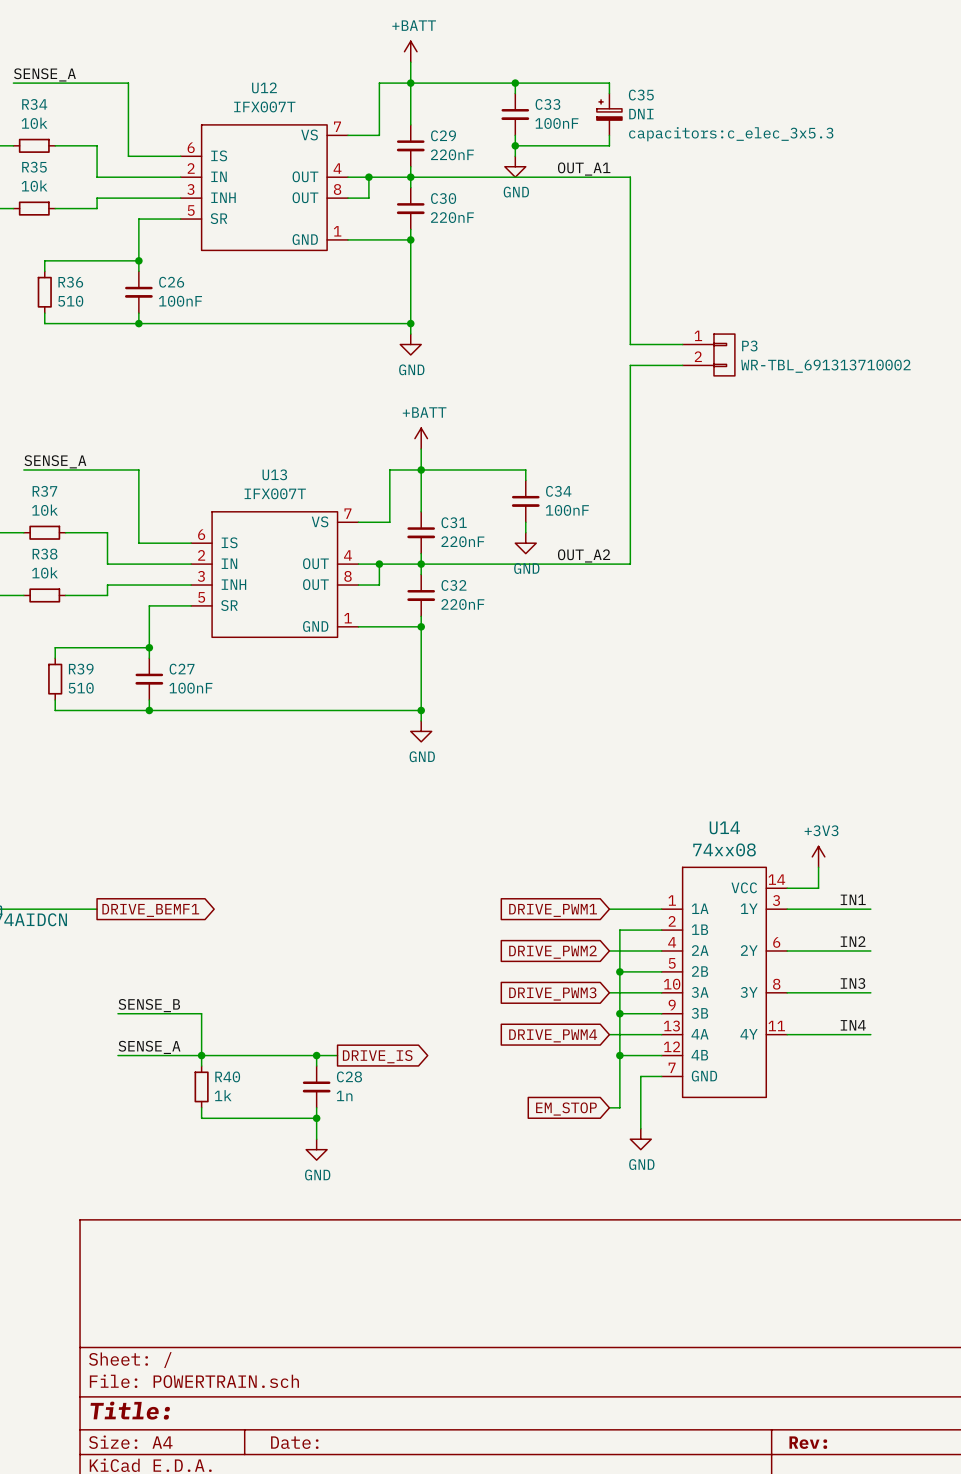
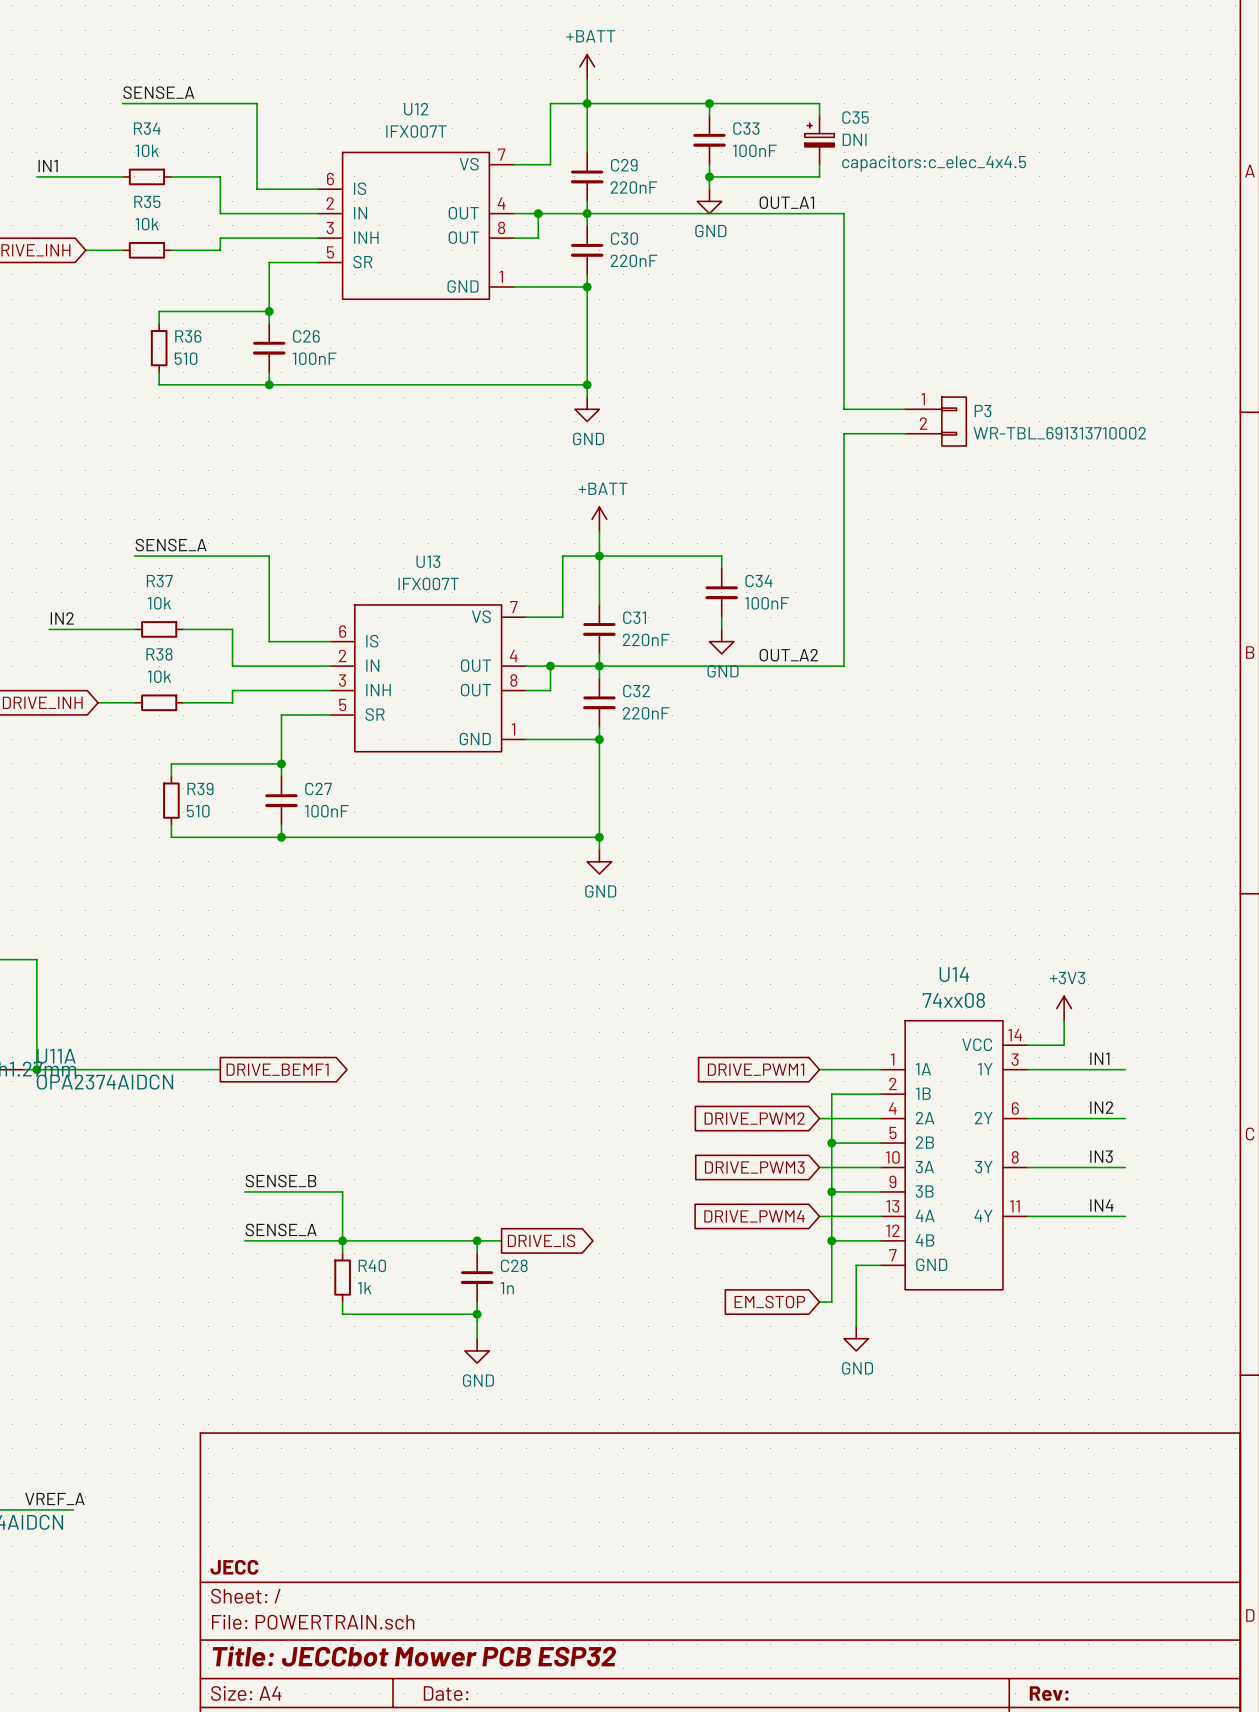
C35 text: capacitors:c_elec_3x5.3 (731, 134) -> capacitors:c_elec_4x4.5 (934, 163)
title block: none -> JECC (234, 1567)
title block: Title: (130, 1410) -> Title: JECCbot Mower PCB ESP32 (414, 1656)

